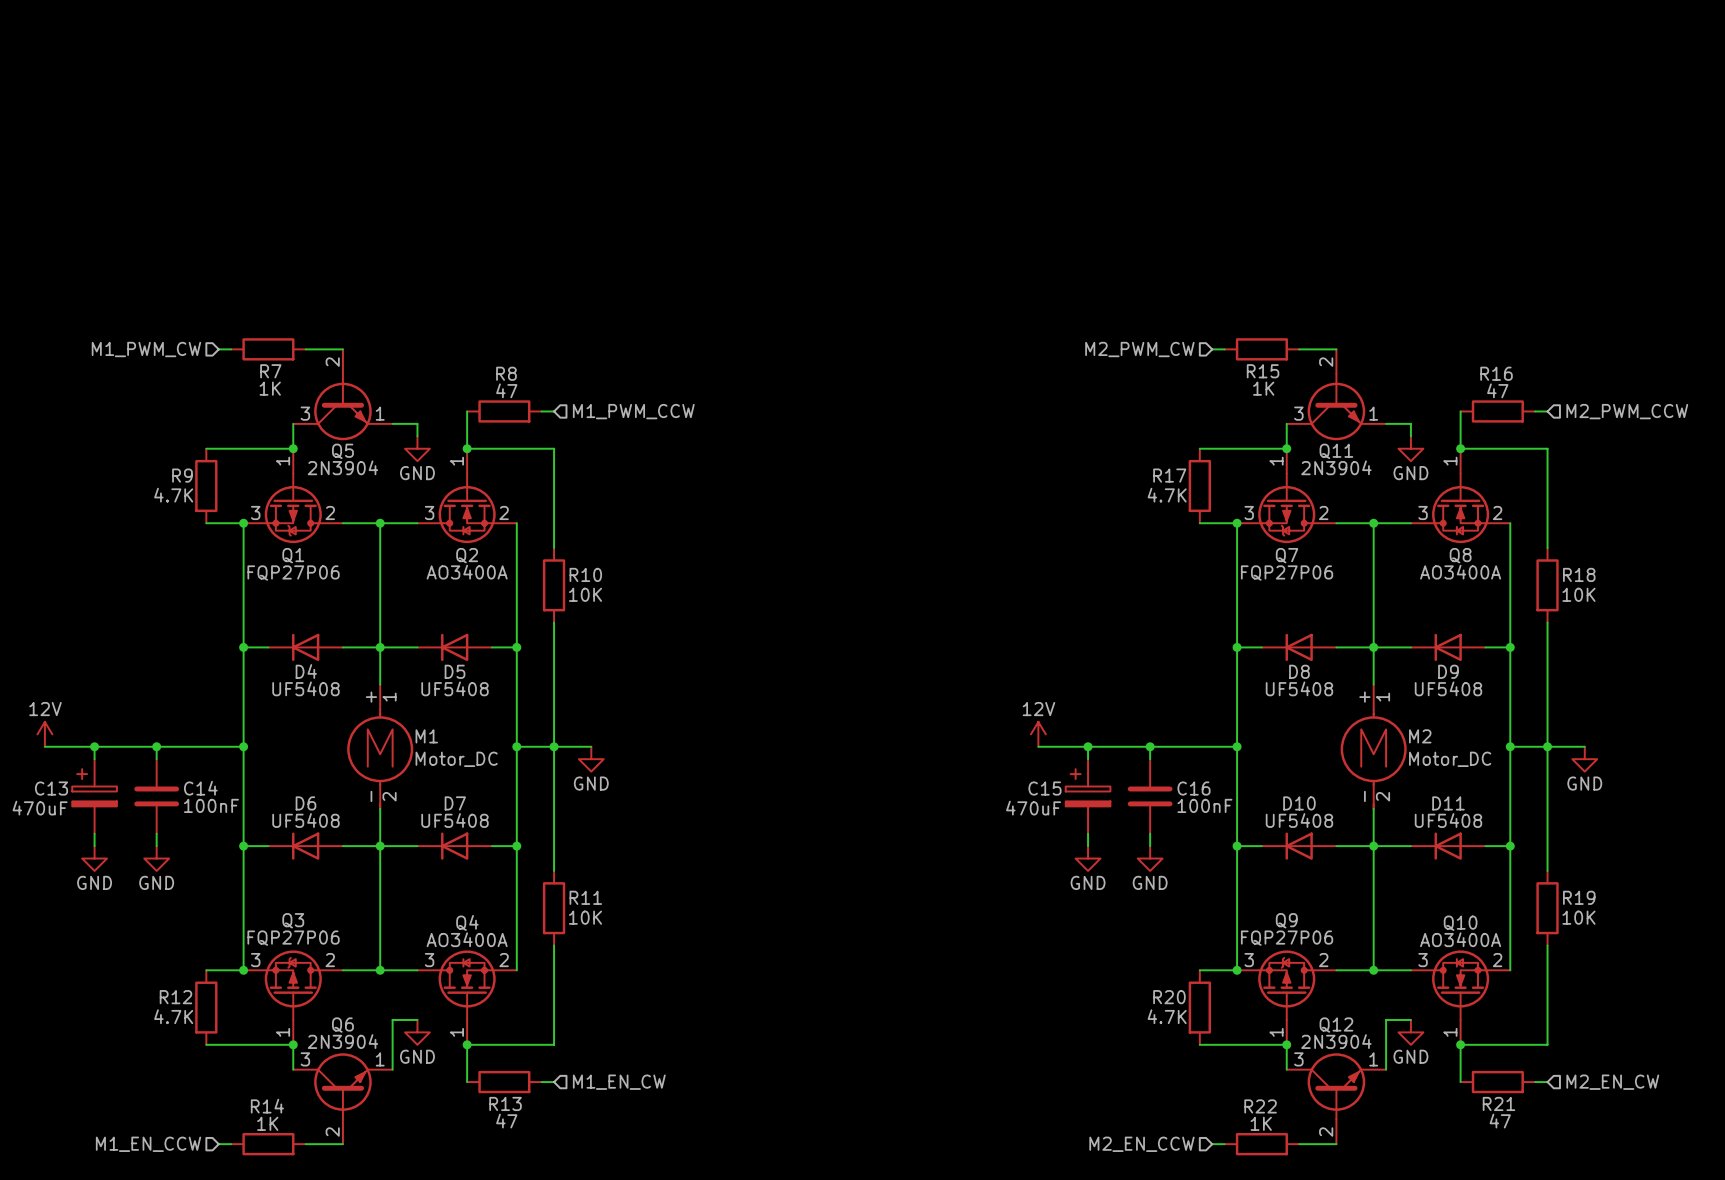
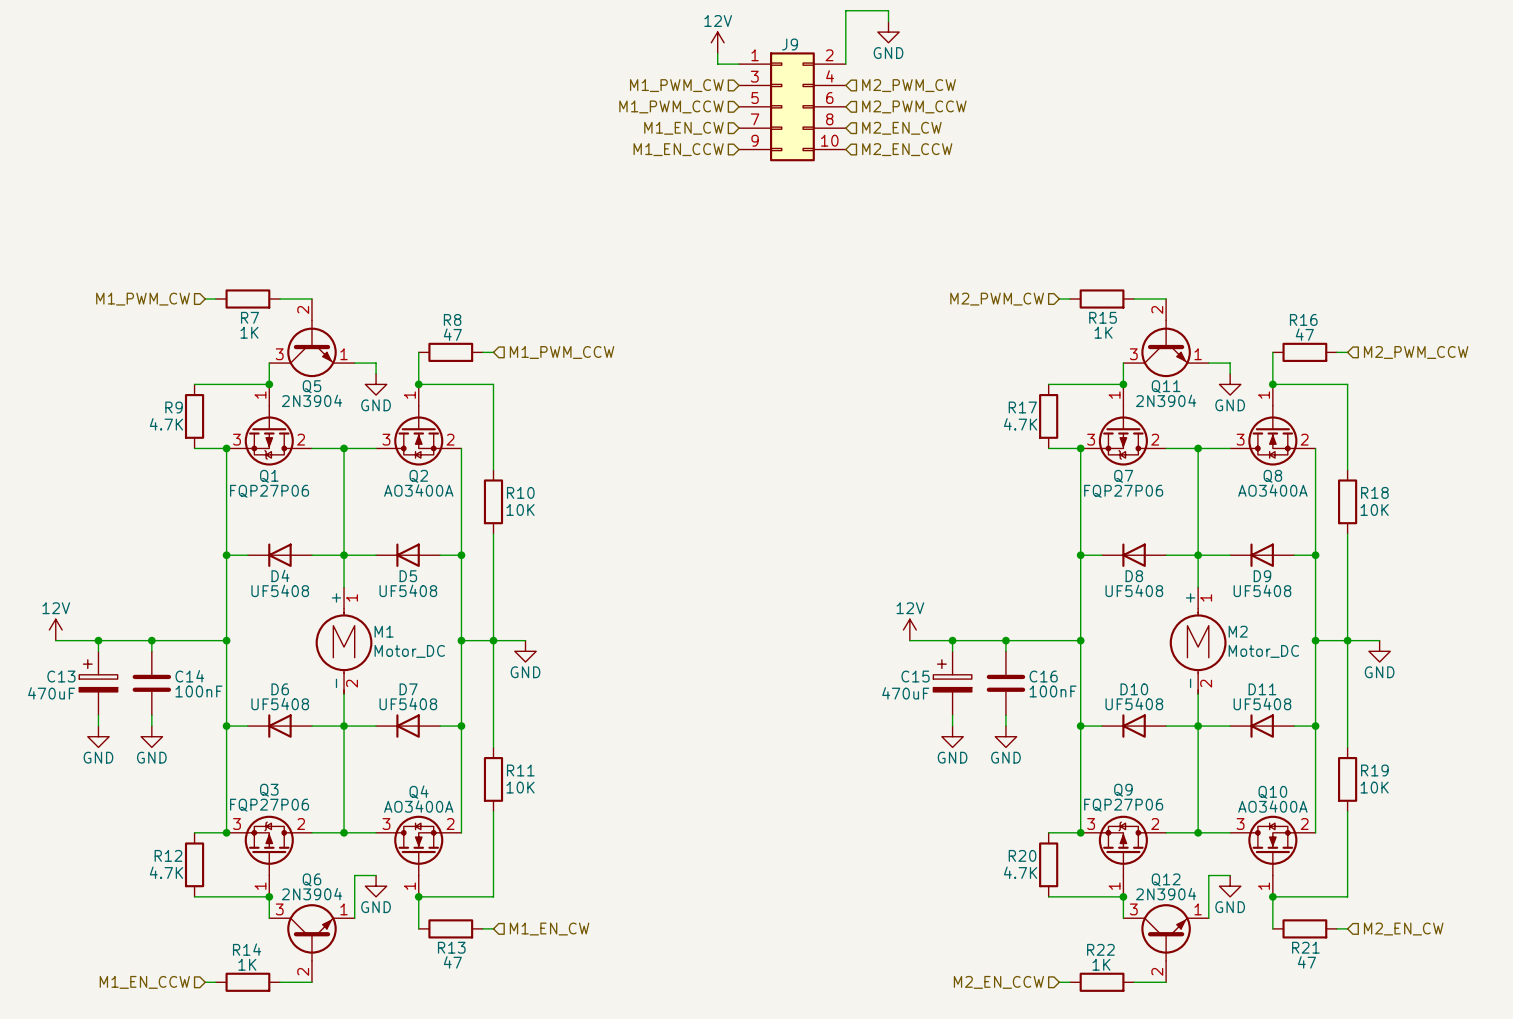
wire: none -> (888, 21) (888, 10) (845, 10) (845, 64)
power symbol: none -> GND (888, 32)
power symbol: none -> 12V (717, 42)
wire: none -> (717, 53) (717, 64) (739, 64)
hierarchical label: none -> M1_PWM_CW (676, 85)
hierarchical label: none -> M2_PWM_CW (909, 85)
hierarchical label: none -> M1_PWM_CCW (671, 106)
J9: none -> (792, 106)
hierarchical label: none -> M2_PWM_CCW (914, 106)
hierarchical label: none -> M1_EN_CW (683, 128)
hierarchical label: none -> M2_EN_CW (901, 128)
hierarchical label: none -> M1_EN_CCW (678, 149)
hierarchical label: none -> M2_EN_CCW (907, 149)

